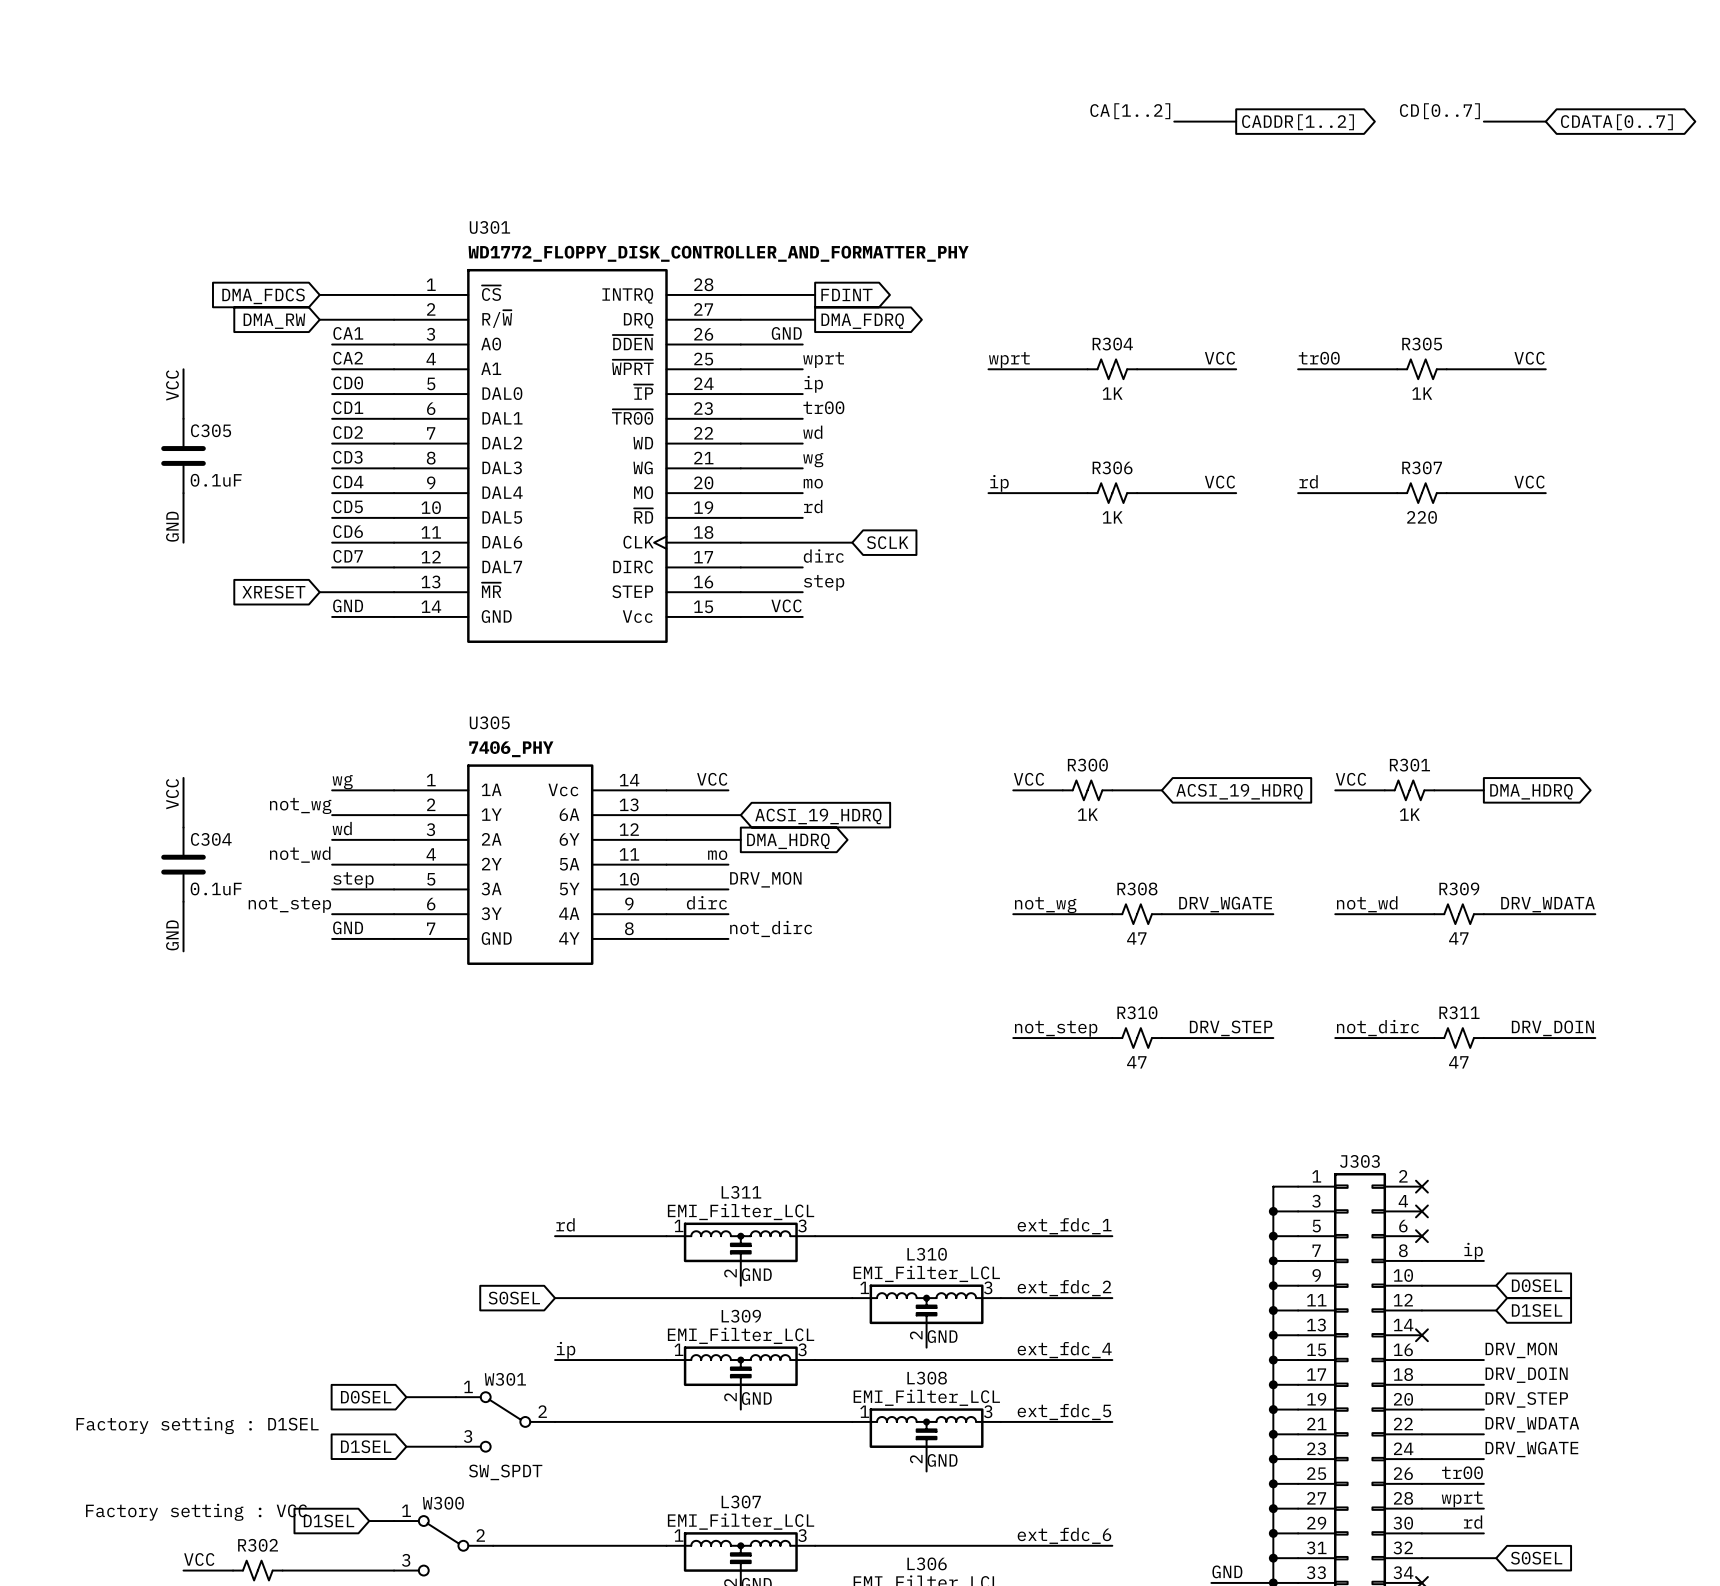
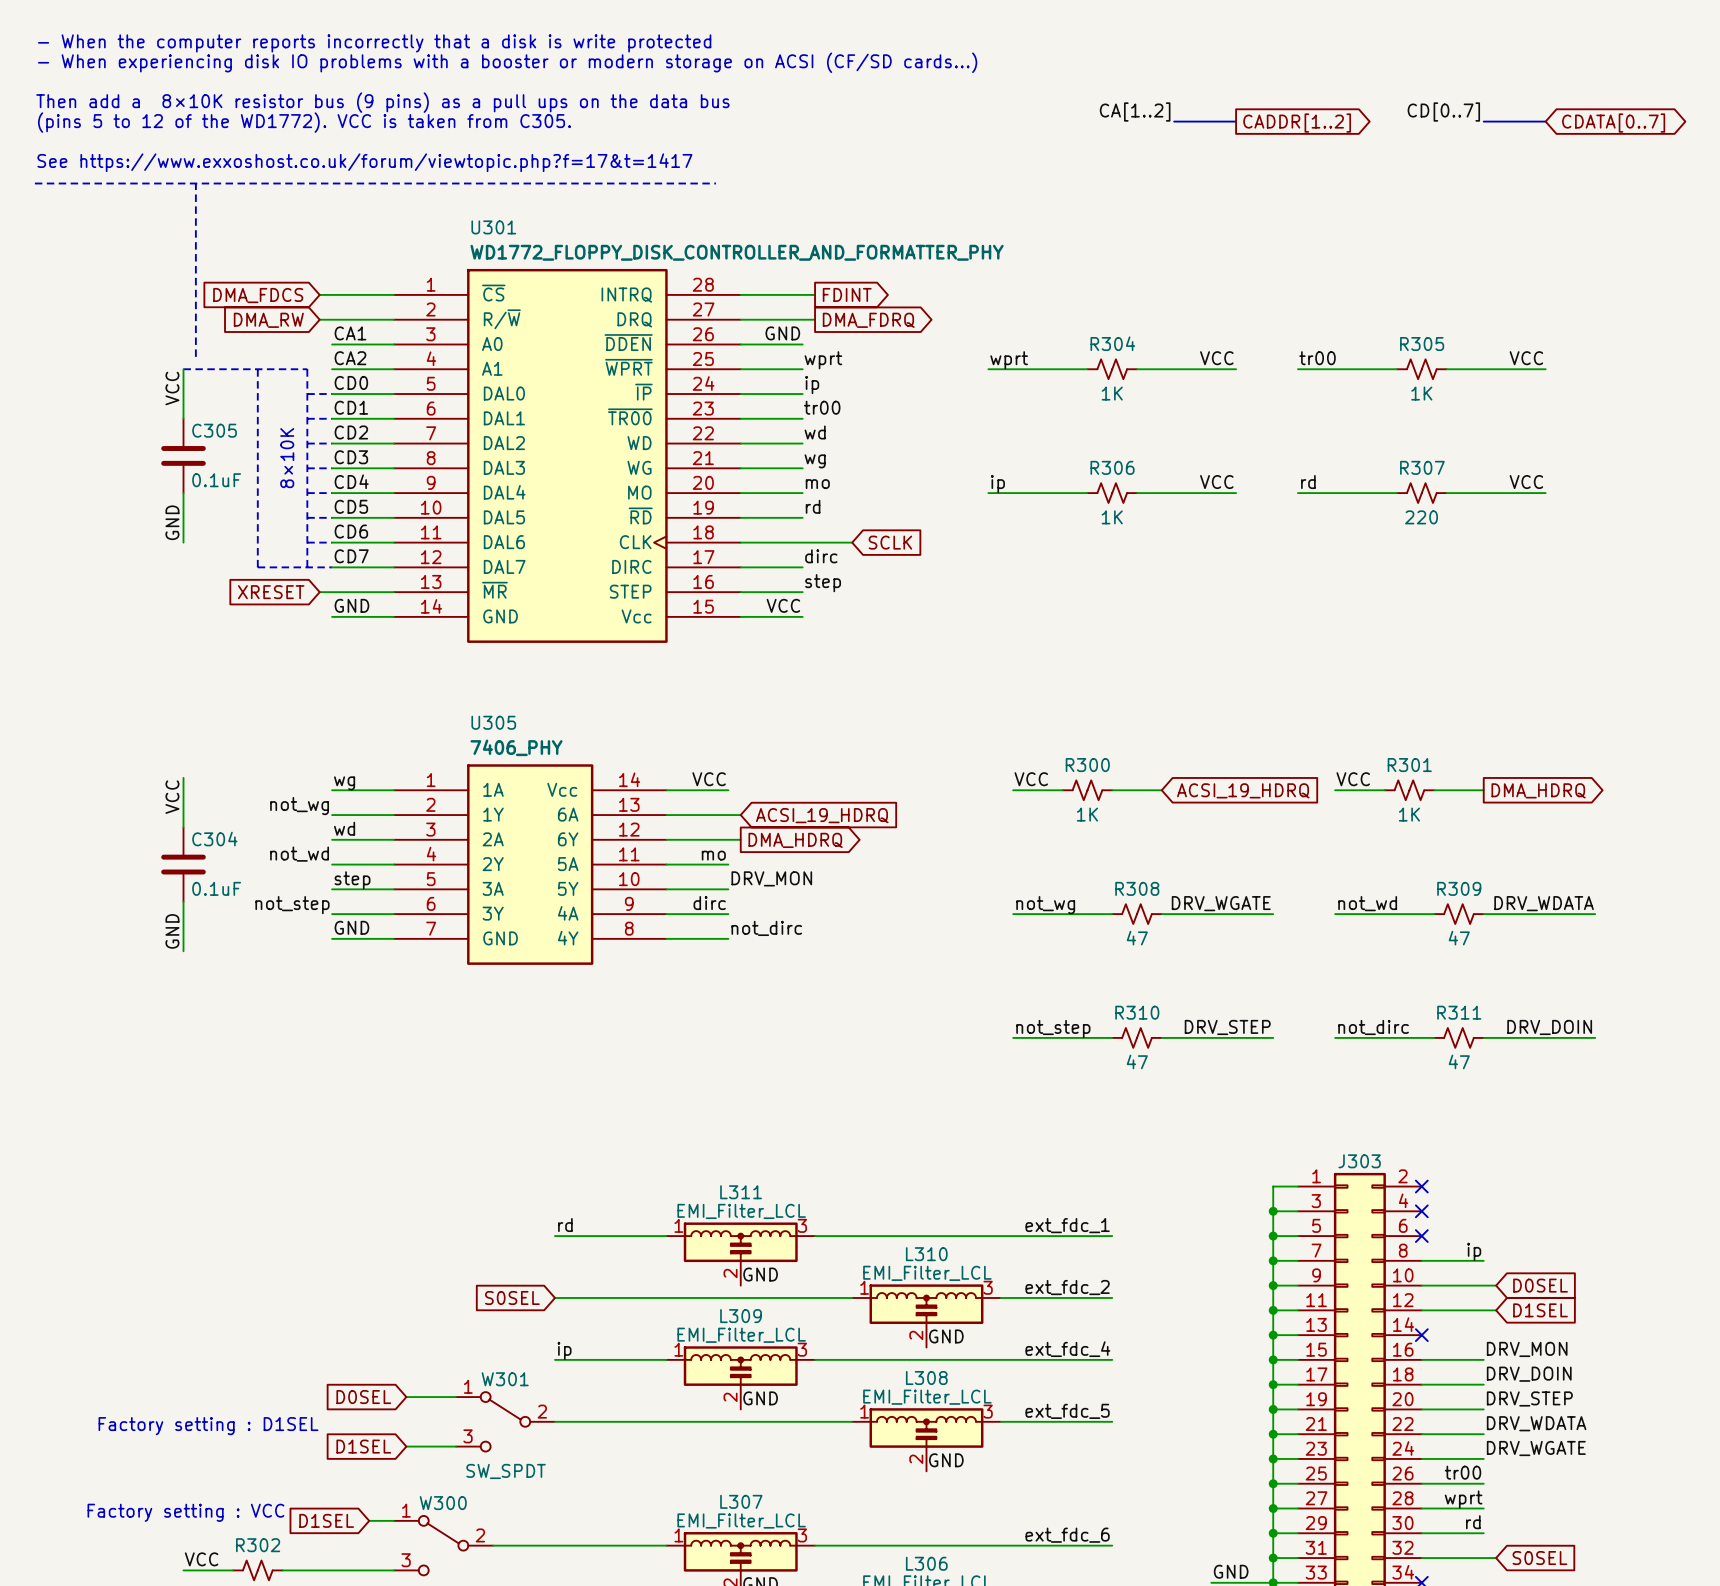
text: none -> - When the computer reports incorrectly that a disk is write protected (374, 43)
text: none -> - When experiencing disk IO problems with a booster or modern storage on ACSI (CF/SD cards...) (507, 62)
text: none -> Then add a 8×10K resistor bus (9 pins) as a pull ups on the data bus (382, 102)
text: none -> (pins 5 to 12 of the WD1772). VCC is taken from C305. (304, 122)
text: none -> See https://www.exxoshost.co.uk/forum/viewtopic.php?f=17&t=1417 (364, 162)
line: none -> (34, 183) (715, 183)
line: none -> (195, 183) (195, 356)
line: none -> (183, 369) (307, 369) (307, 567)
line: none -> (257, 369) (257, 567) (332, 567)
line: none -> (307, 394) (332, 394)
line: none -> (307, 418) (332, 418)
line: none -> (307, 443) (332, 443)
text: none -> 8×10K (287, 458)
line: none -> (307, 468) (332, 468)
line: none -> (307, 493) (332, 493)
line: none -> (307, 517) (332, 517)
line: none -> (307, 542) (332, 542)

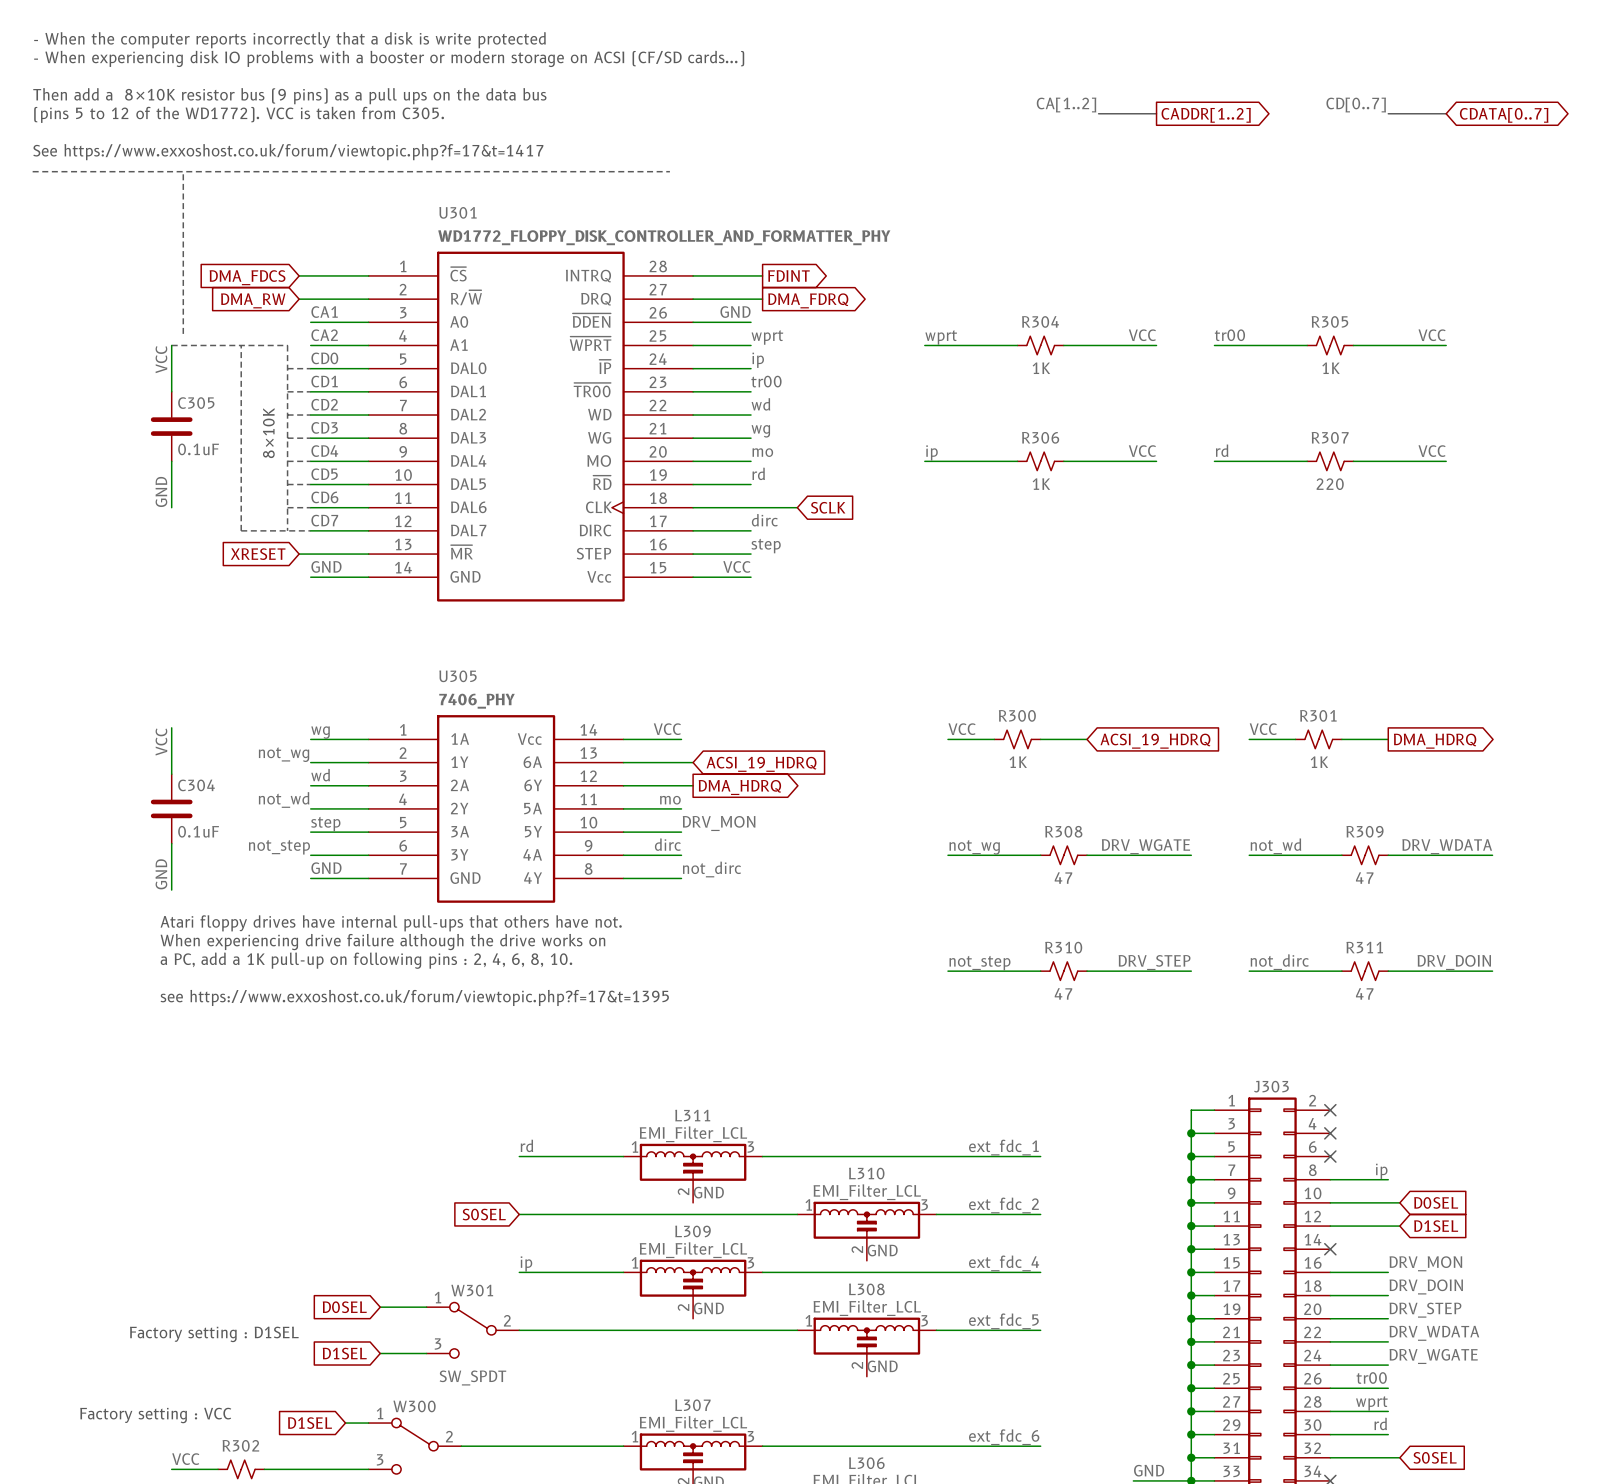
text: none -> Atari floppy drives have internal pull-ups that others have not. (391, 923)
text: none -> When experiencing drive failure although the drive works on (382, 942)
text: none -> a PC, add a 1K pull-up on following pins : 2, 4, 6, 8, 10. (366, 960)
text: none -> see https://www.exxoshost.co.uk/forum/viewtopic.php?f=17&t=1395 (414, 997)

